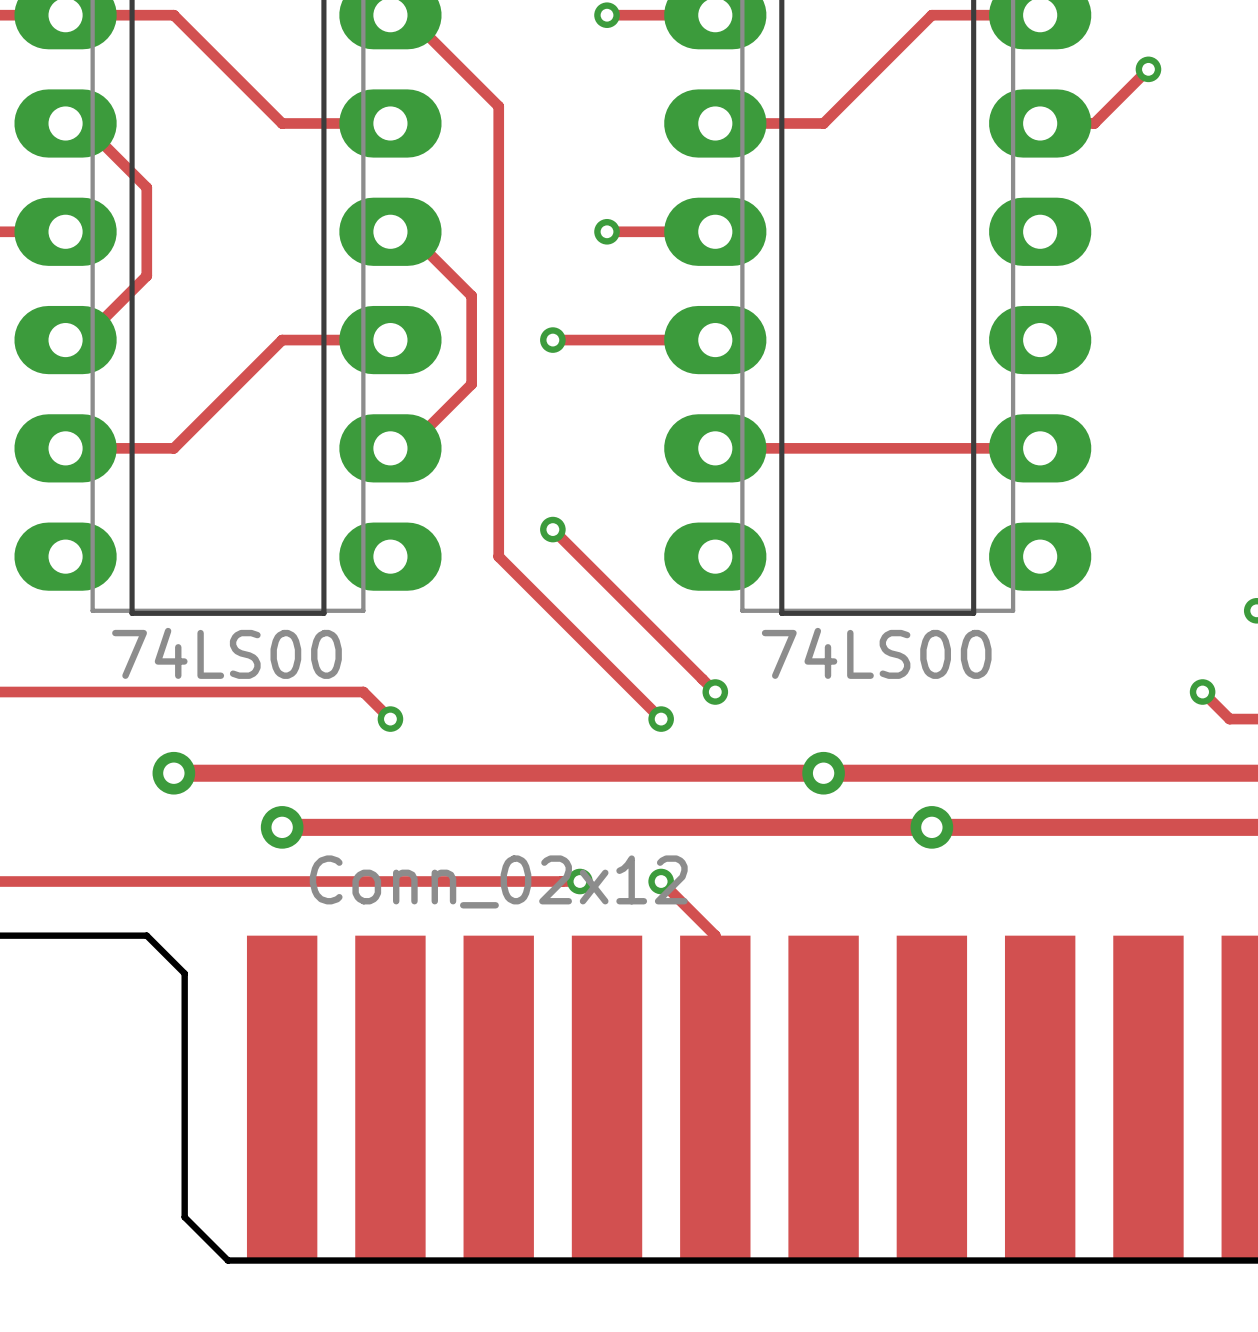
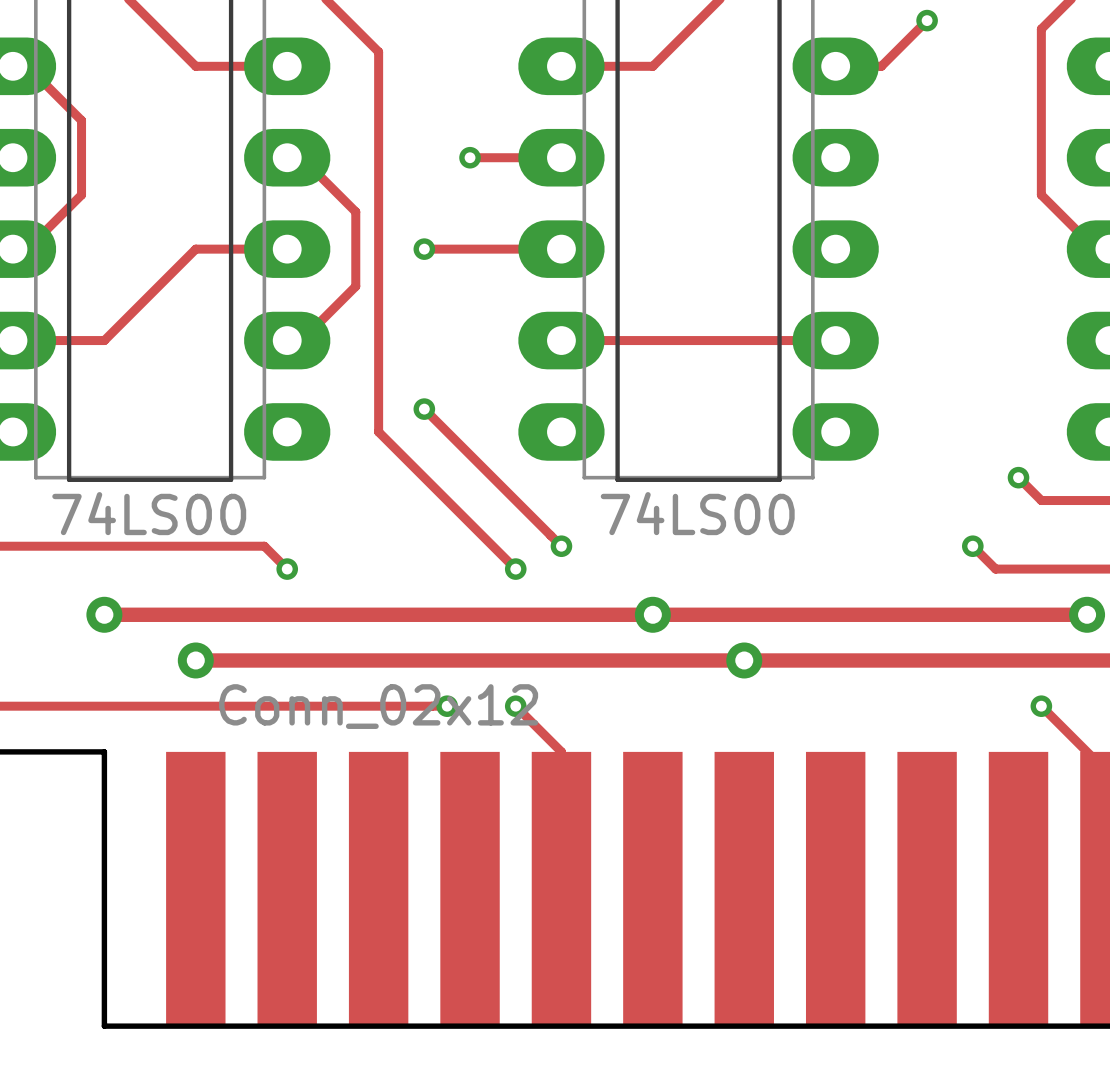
board edge: (146, 935) (184, 973) (184, 1217) (228, 1260) -> (81, 751) (104, 751) (104, 1026) (150, 1026)

